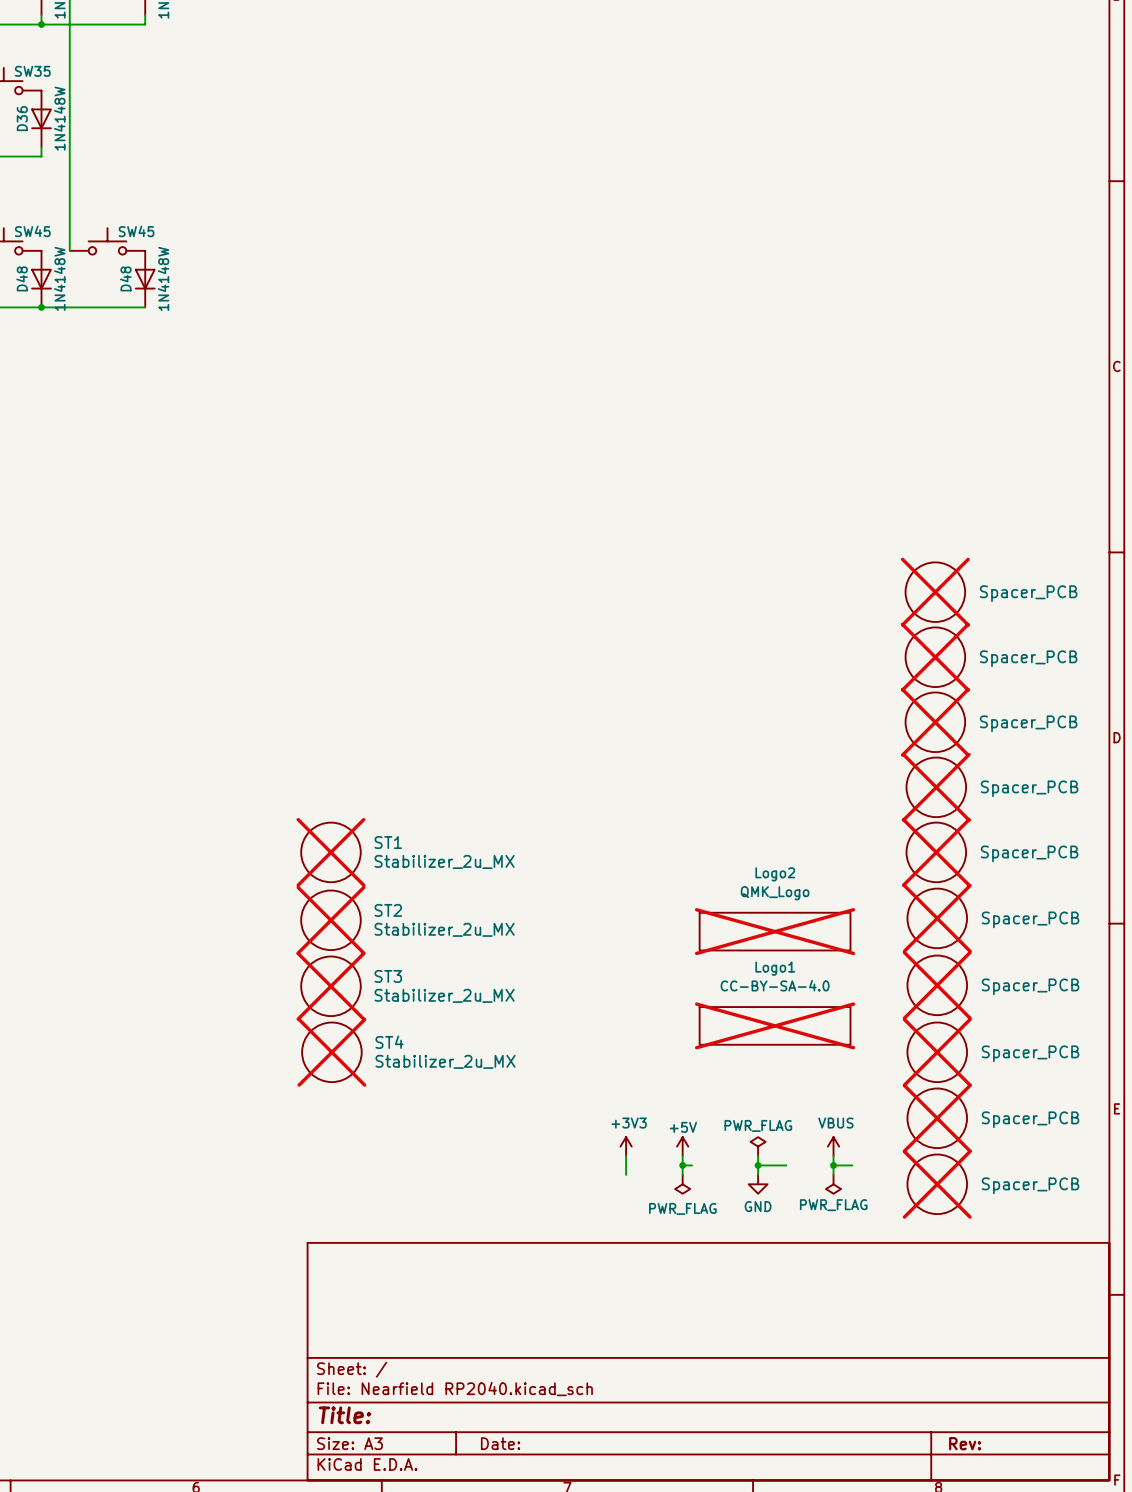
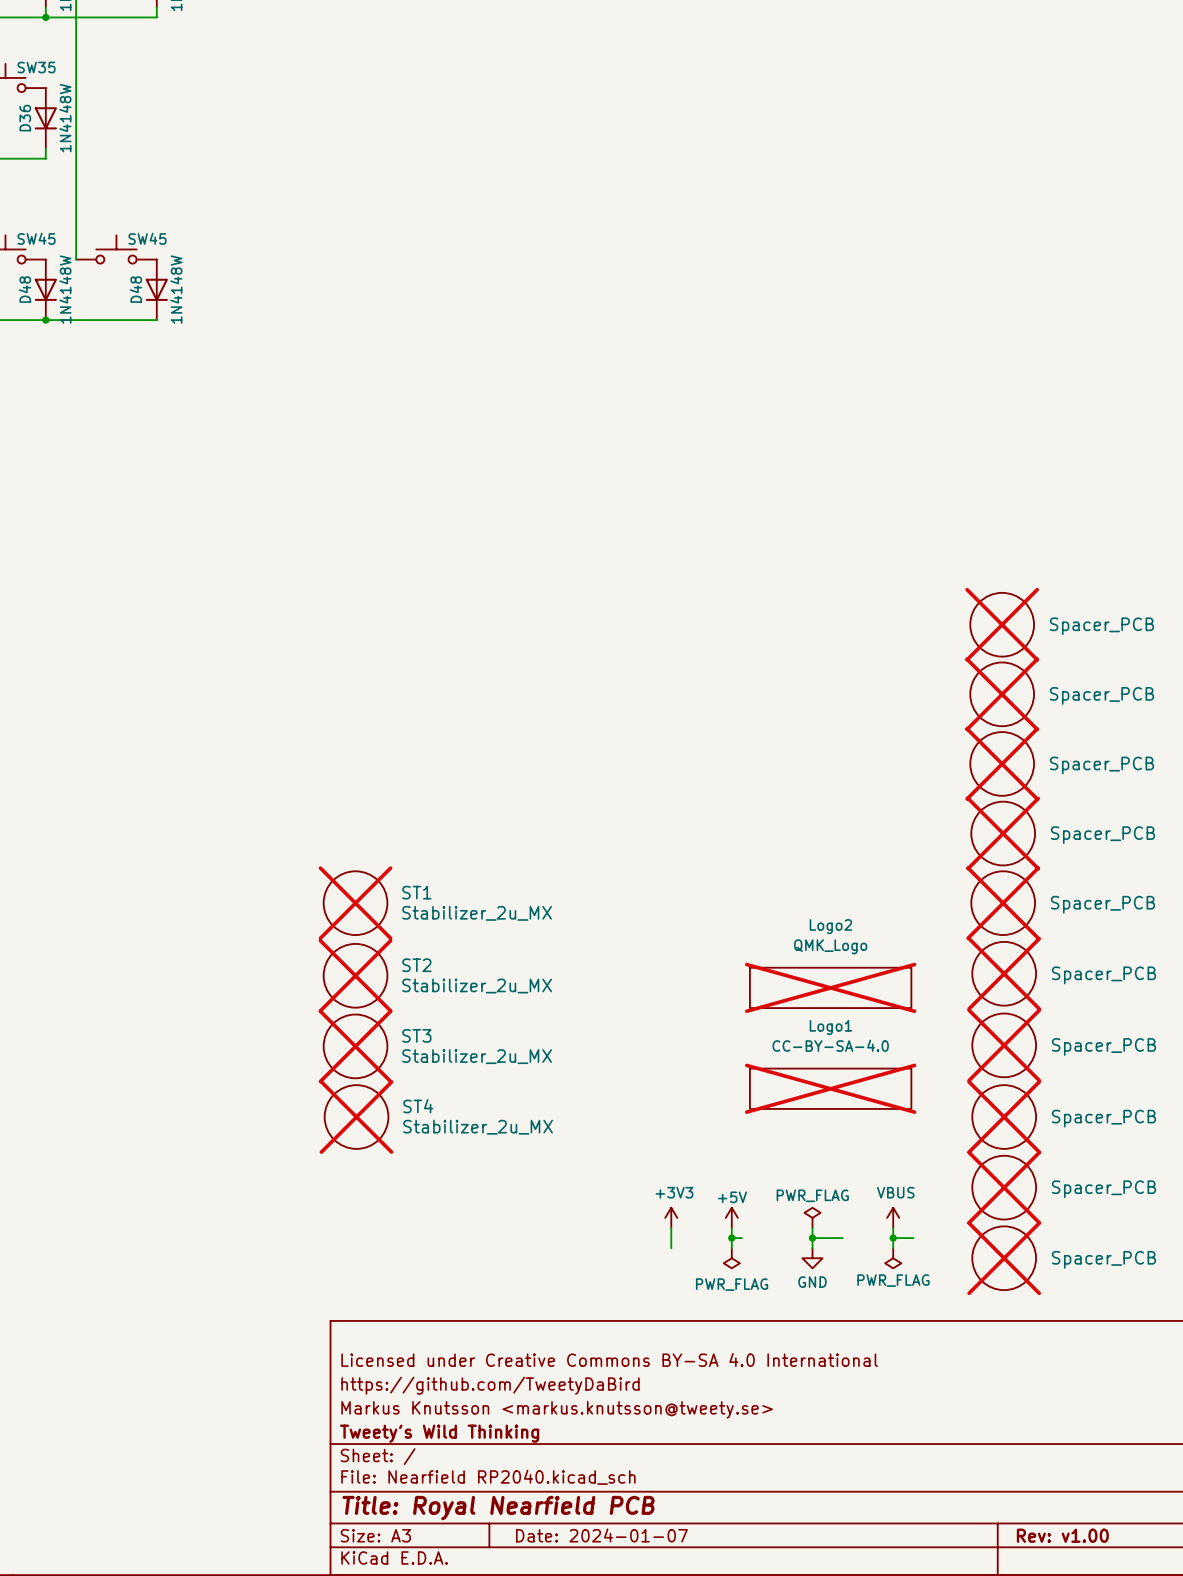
title block: none -> Licensed under Creative Commons BY-SA 4.0 International (609, 1359)
title block: none -> https://github.com/TweetyDaBird (490, 1385)
title block: none -> Markus Knutsson <markus.knutsson@tweety.se> (557, 1409)
title block: none -> Tweety's Wild Thinking (439, 1433)
title block: Title: (344, 1415) -> Title: Royal Nearfield PCB (498, 1508)
title block: Date: (500, 1443) -> Date: 2024-01-07 (601, 1535)
title block: Rev: (965, 1443) -> Rev: v1.00 (1062, 1535)

